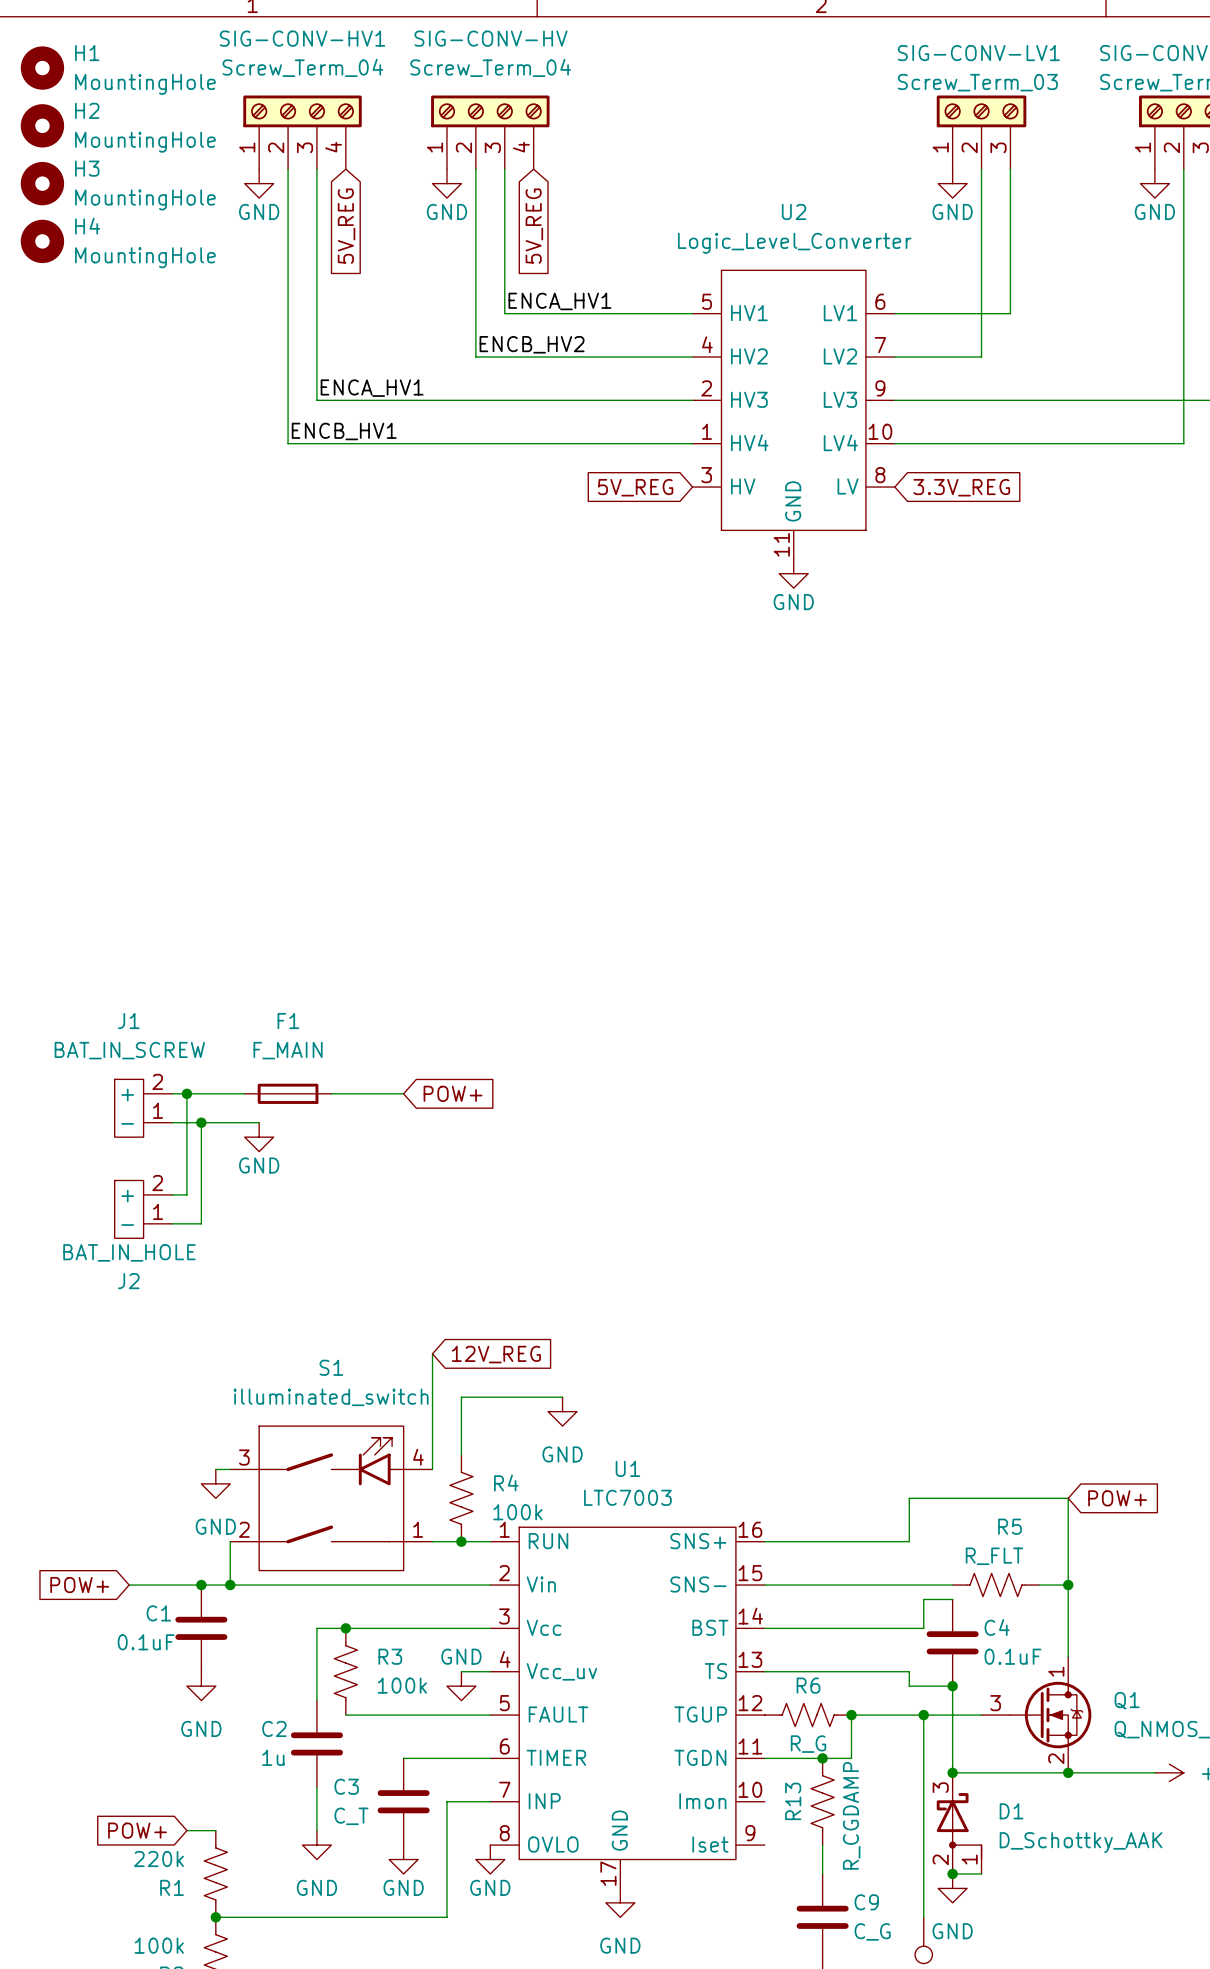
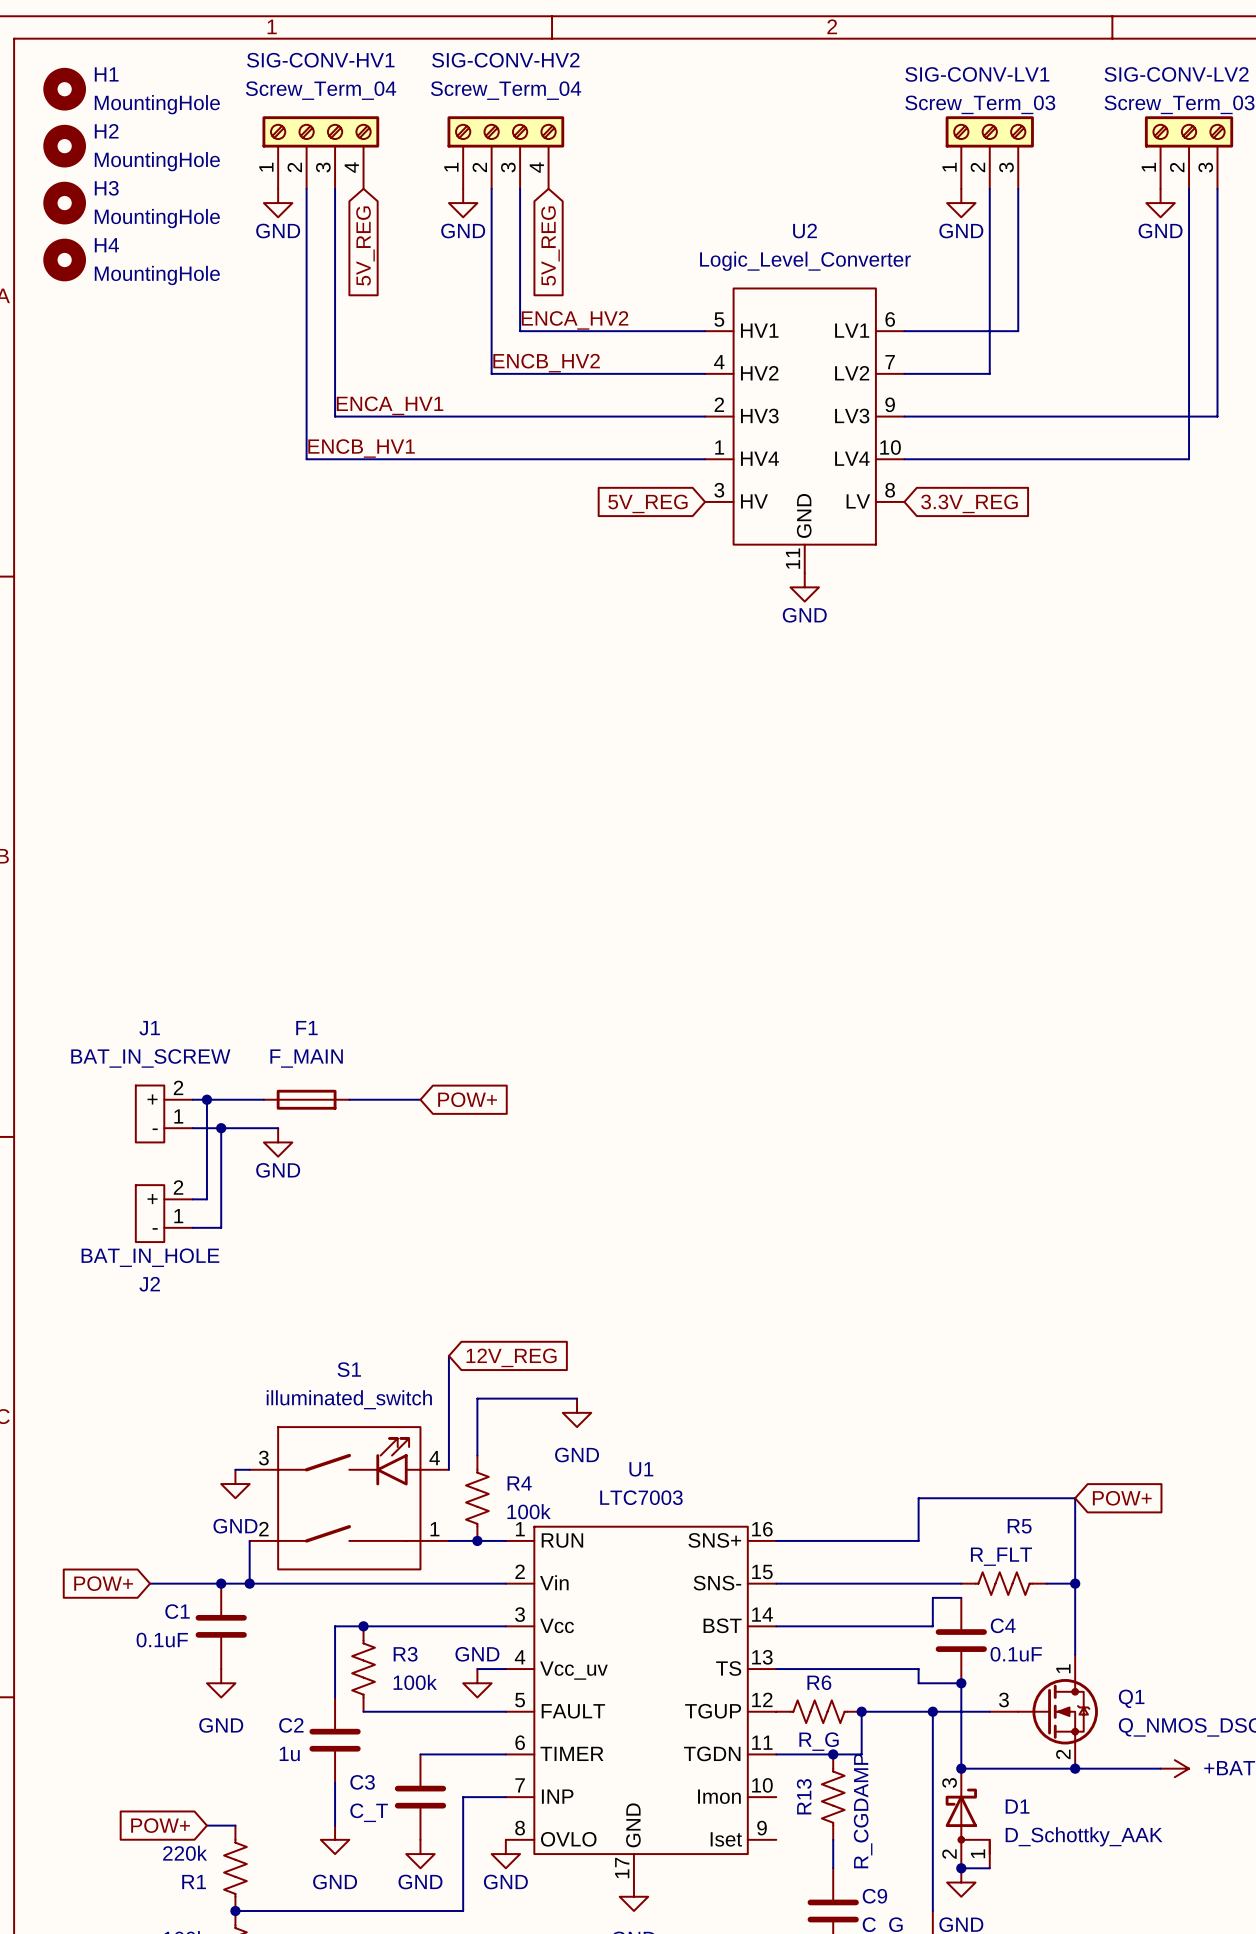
SIG-CONV-HV name: SIG-CONV-HV (491, 38) -> SIG-CONV-HV2 (505, 60)
label: ENCA_HV1 (559, 301) -> ENCA_HV2 (575, 320)

